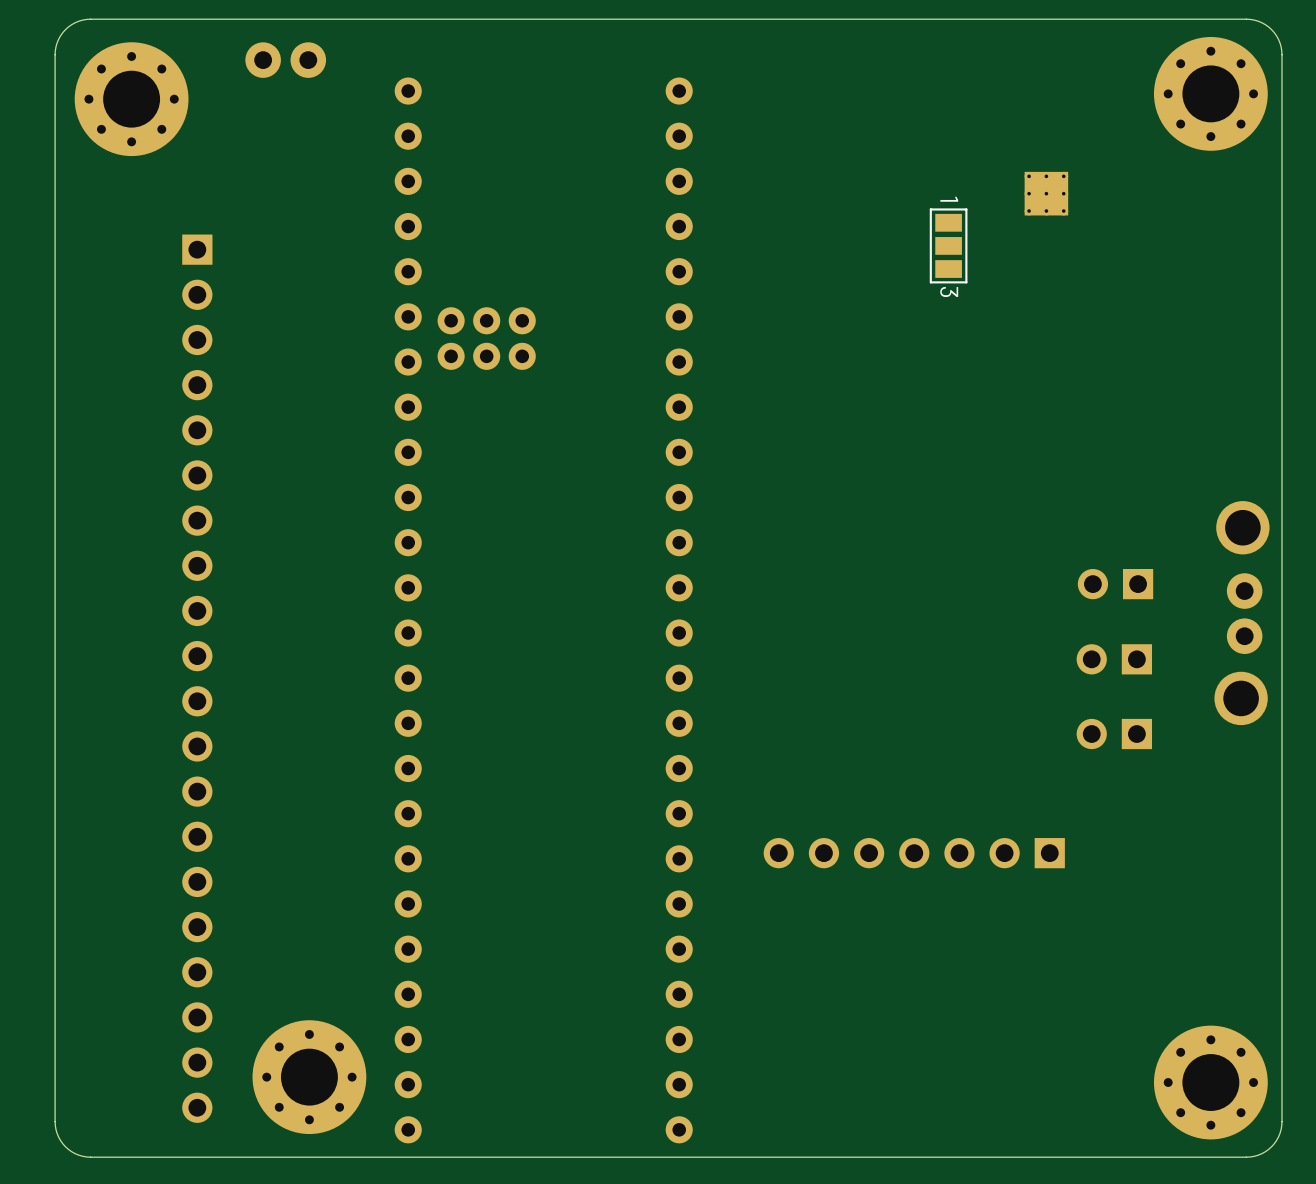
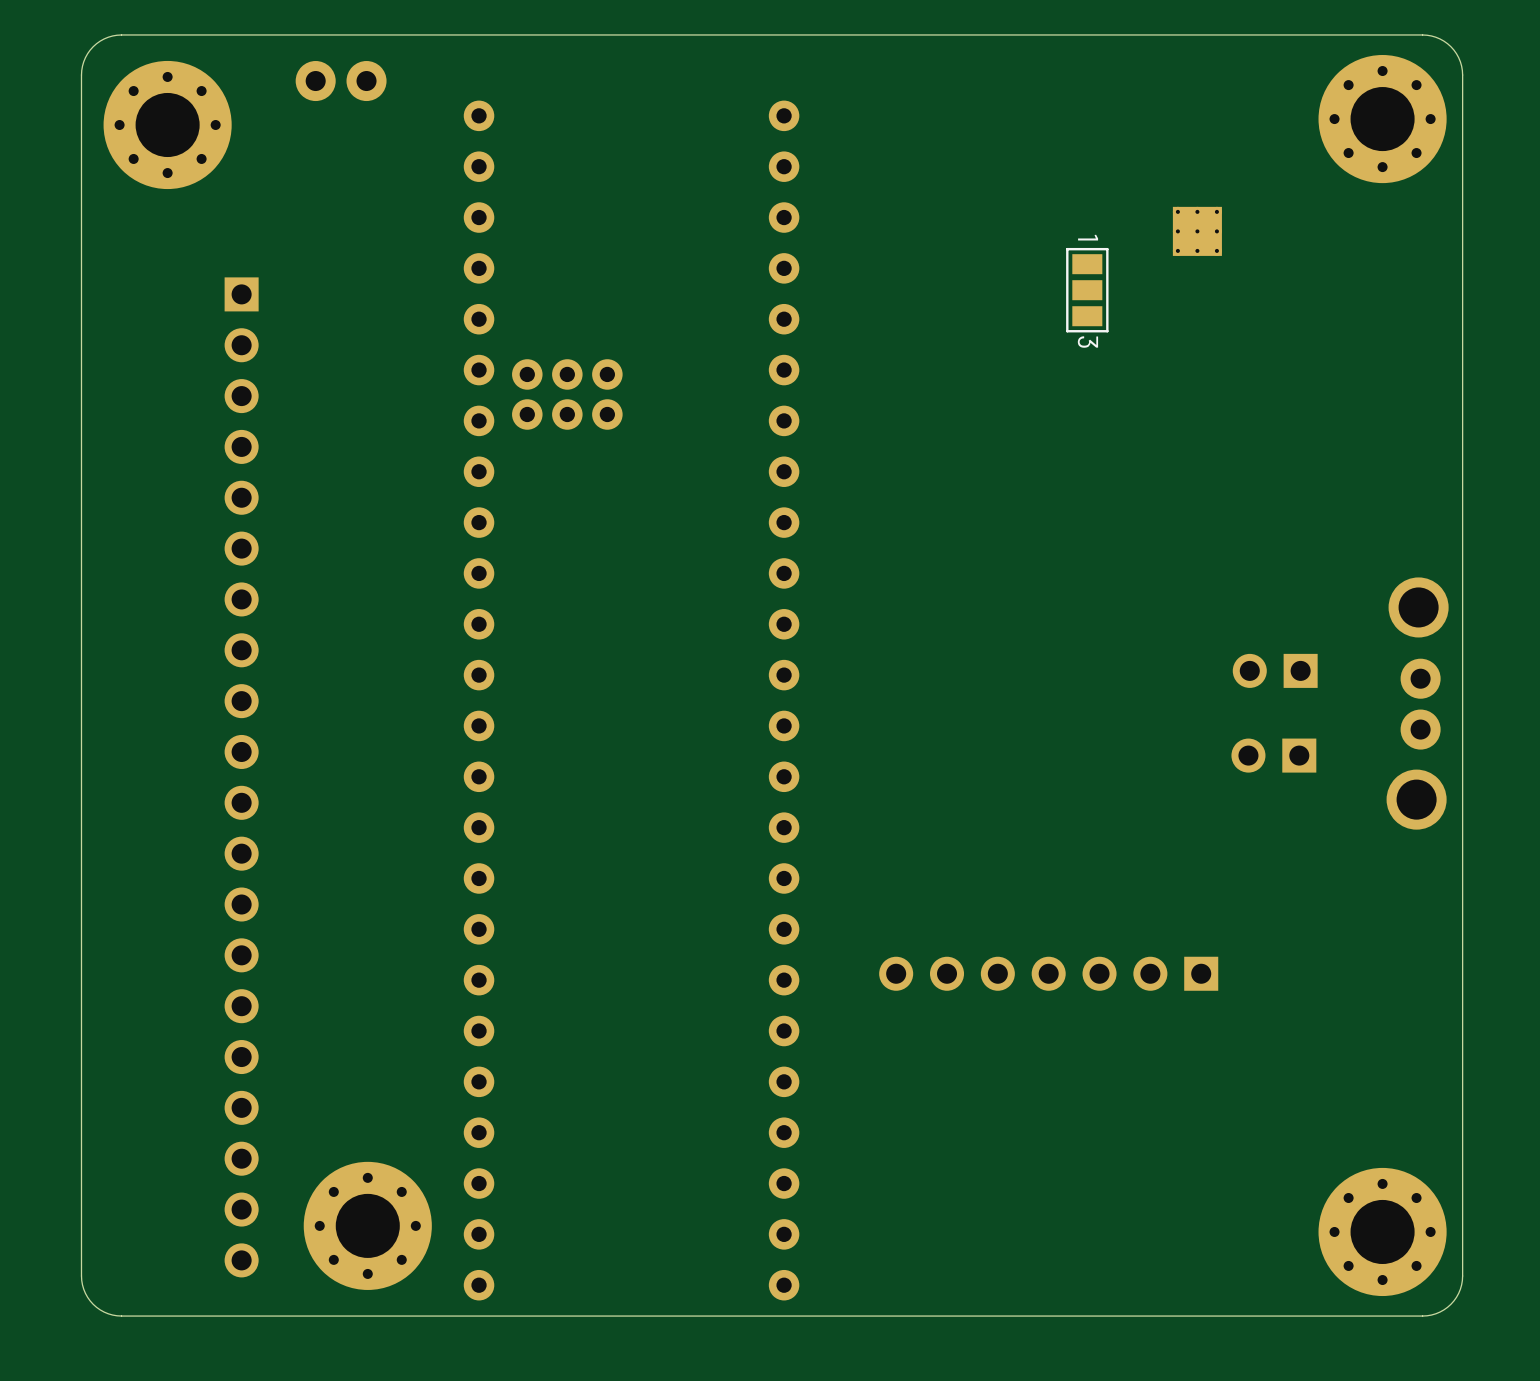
part: (1114, 734) -> none

